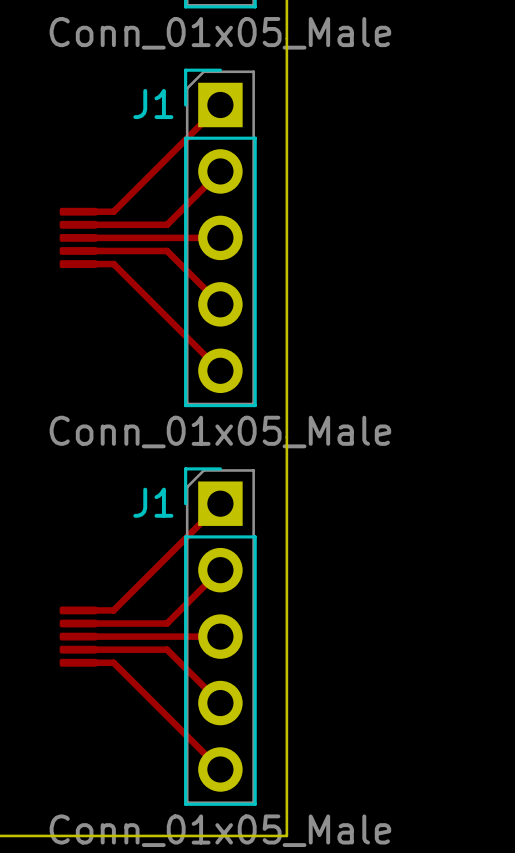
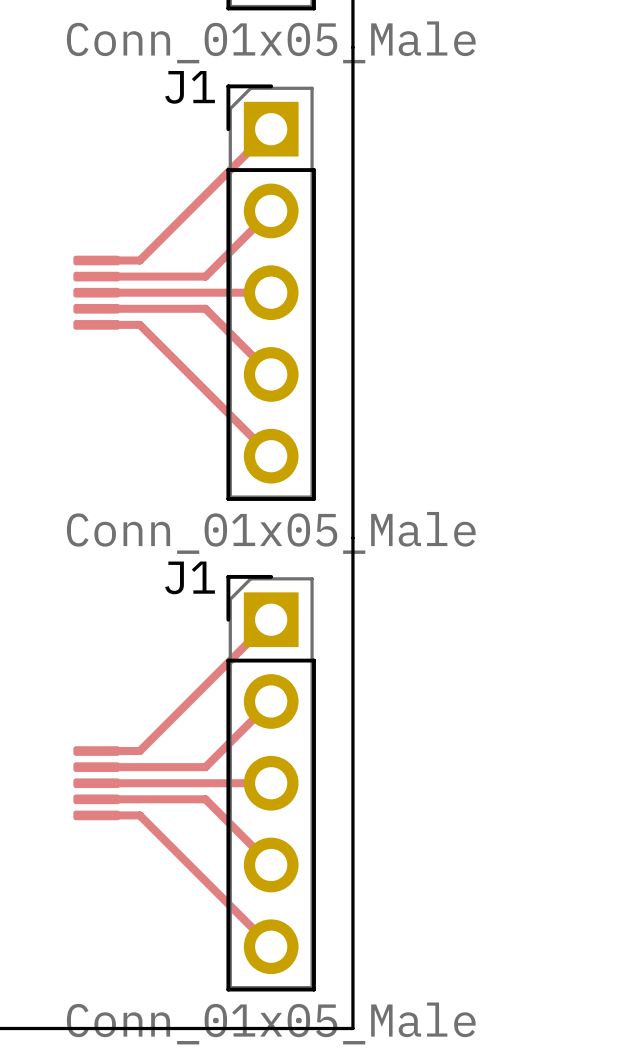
J1 name position: J1 (153, 104) -> J1 (190, 87)
J1 name position: J1 (153, 502) -> J1 (190, 577)

